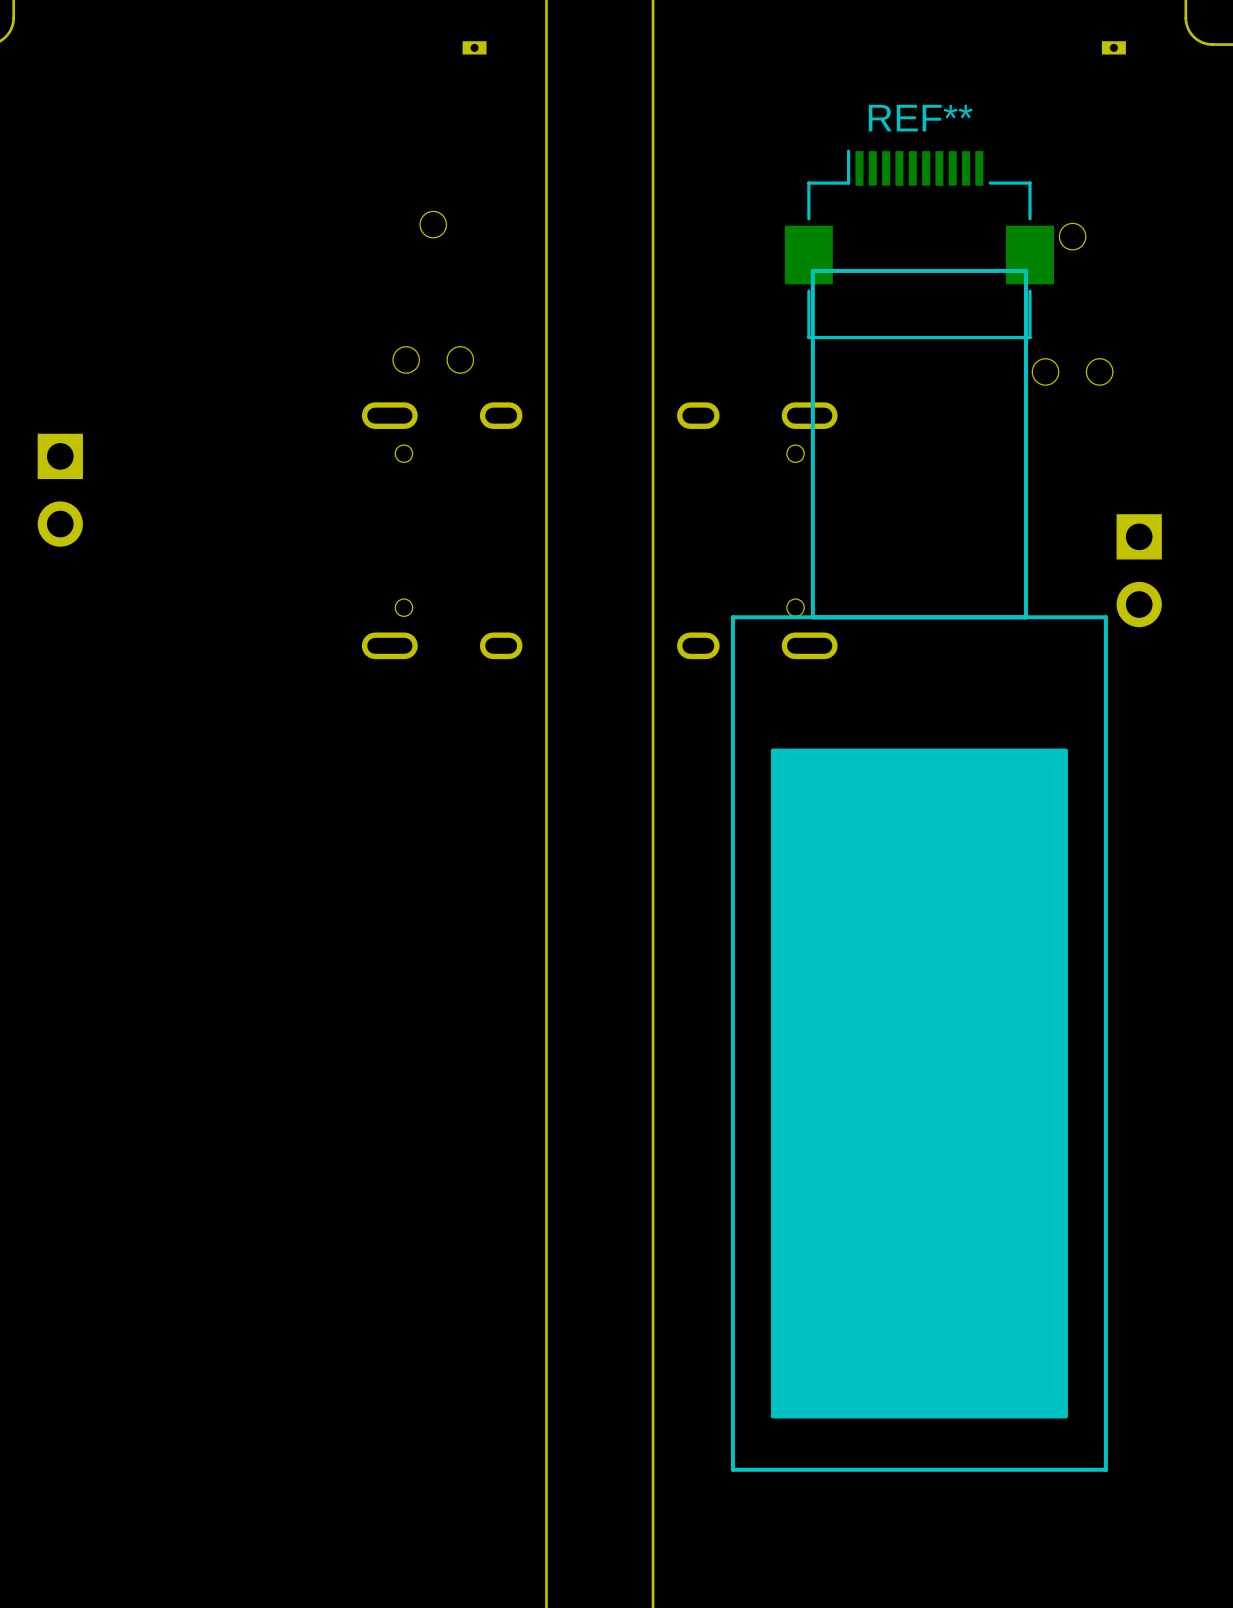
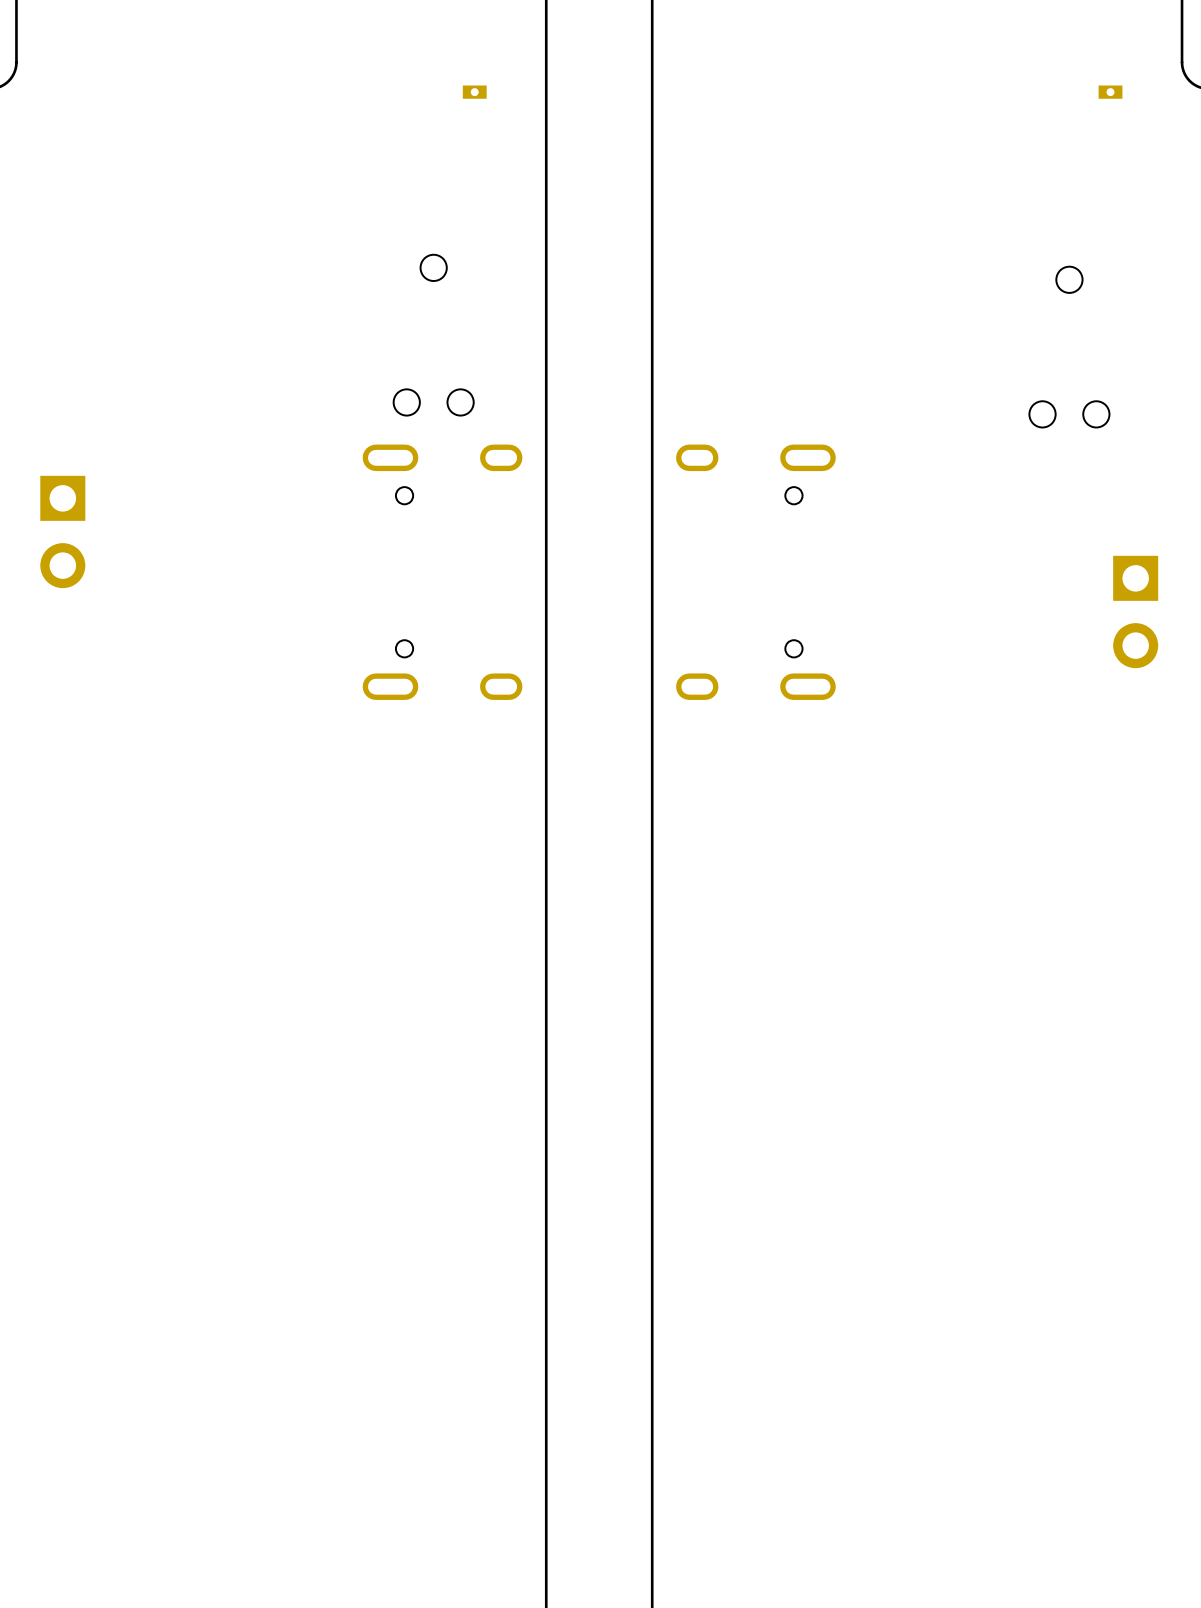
REF**: (919, 244) -> none
line: (1025, 617) (1025, 270) (812, 270) (812, 617) -> none
line: (1105, 617) (732, 617) (732, 1469) (1105, 1469) (1105, 617) -> none
drawing: [770, 748, 1068, 1419] -> none

